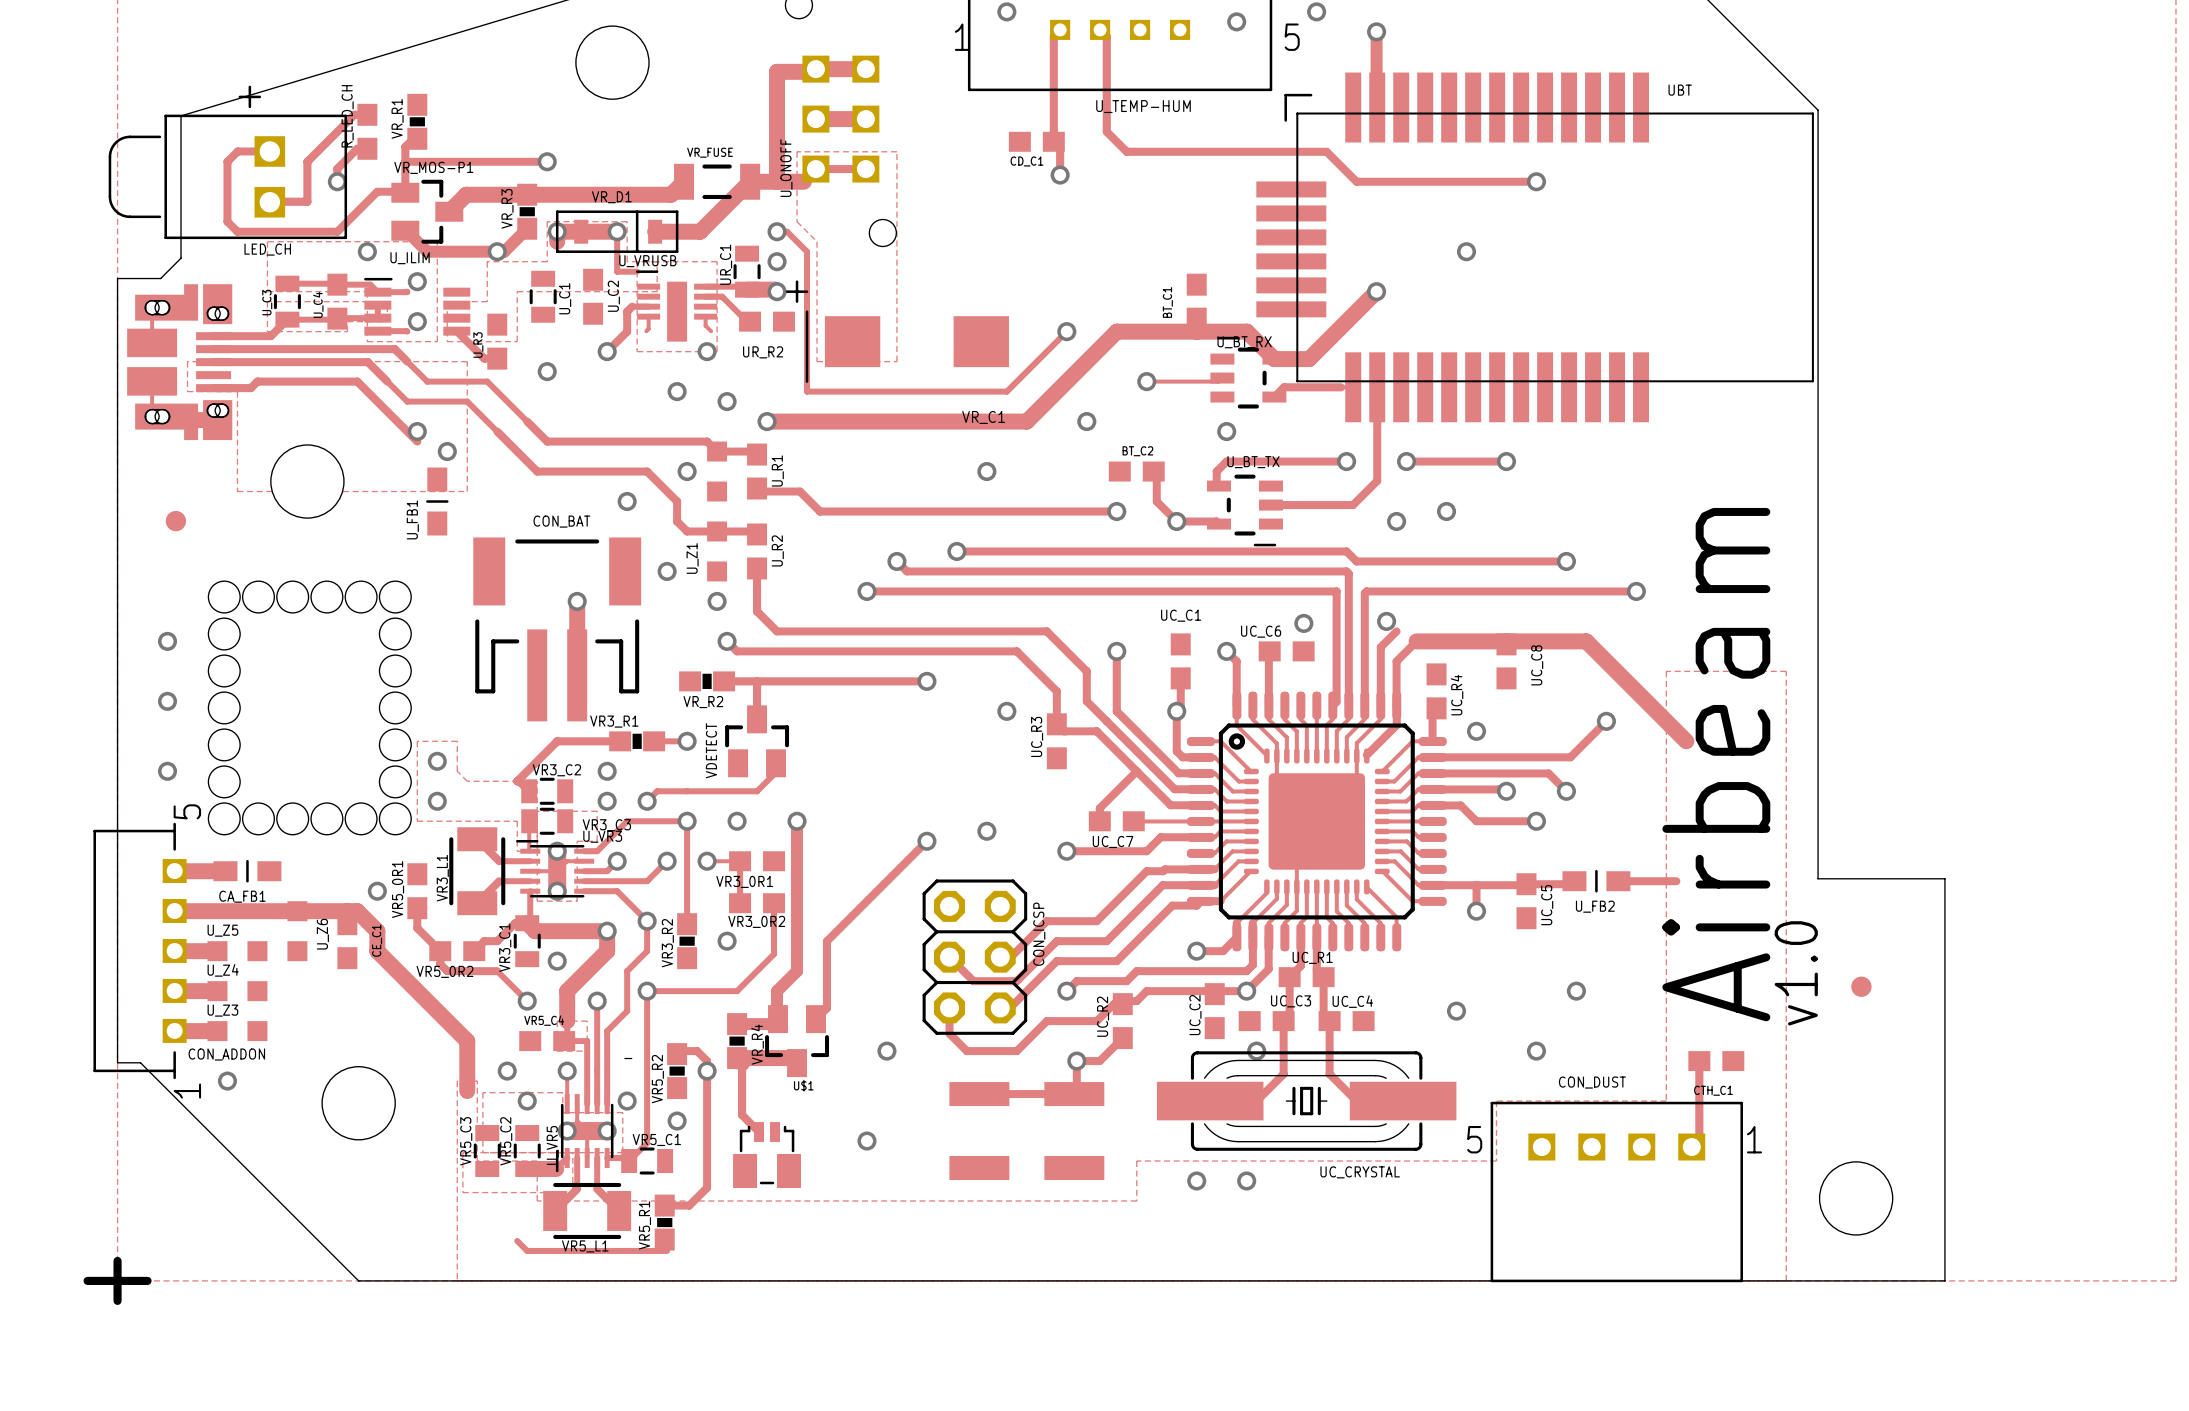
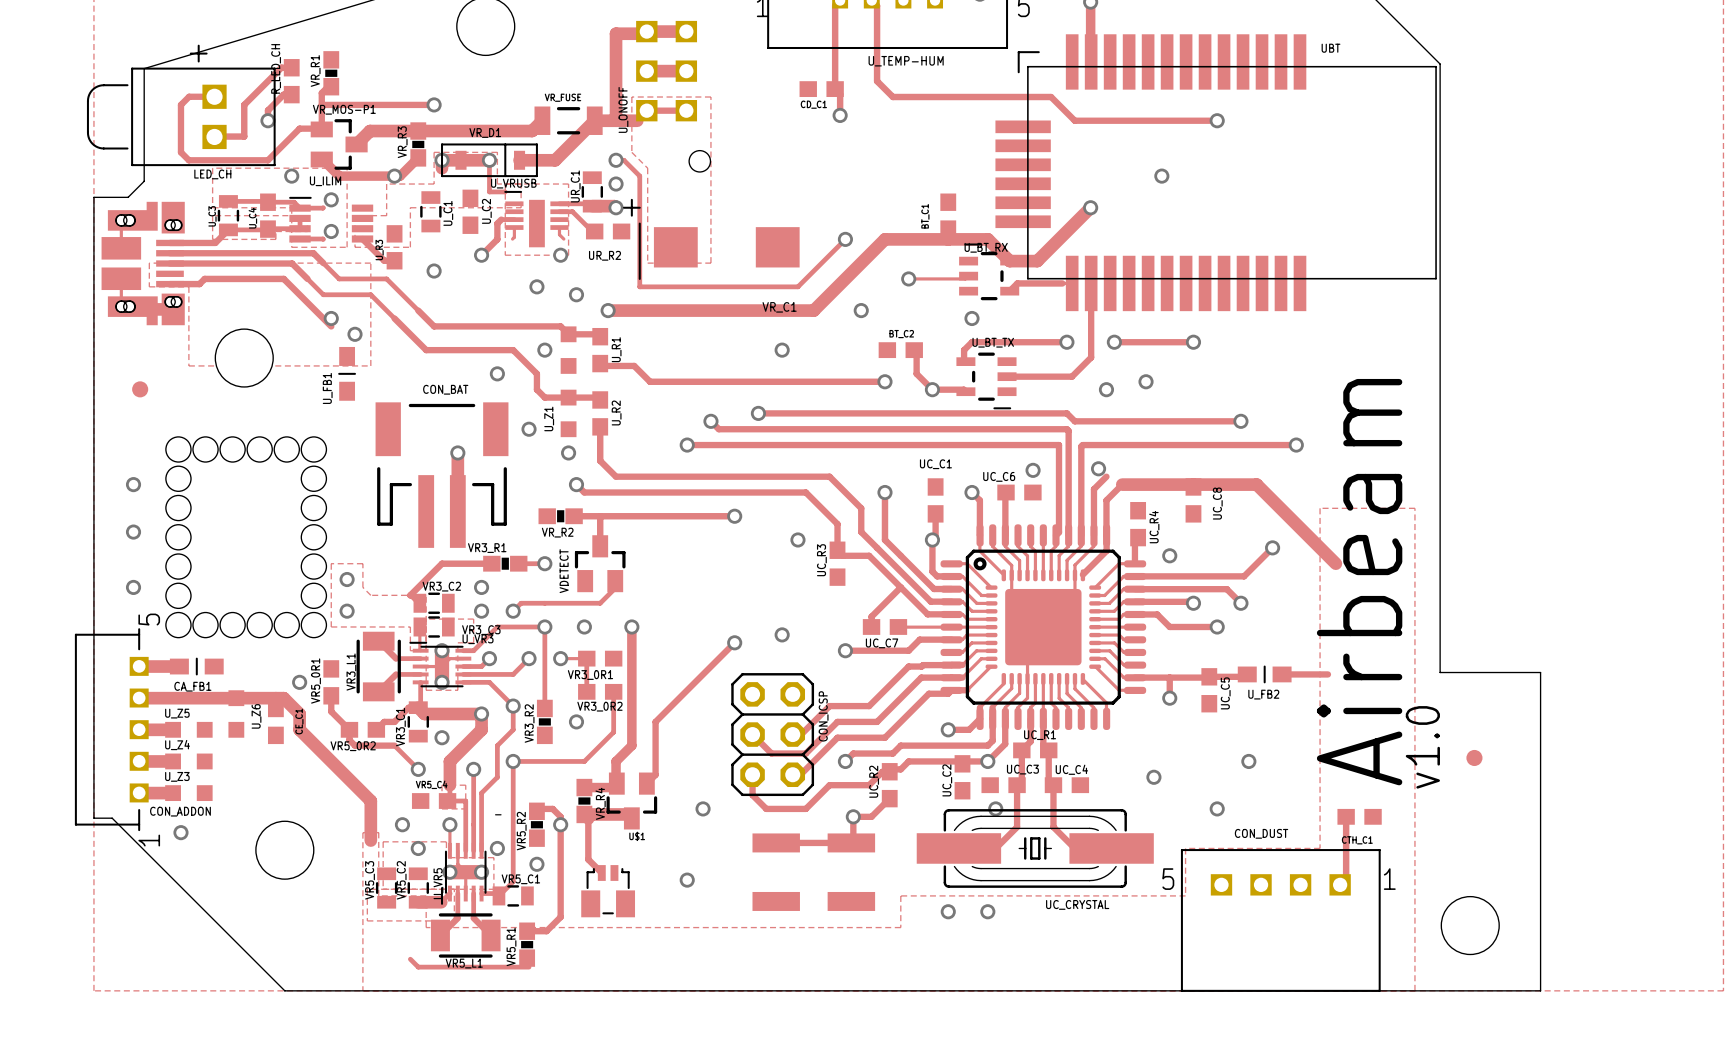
board edge: (117, 1260) (117, 1300) -> none
board edge: (87, 1280) (147, 1280) -> none

